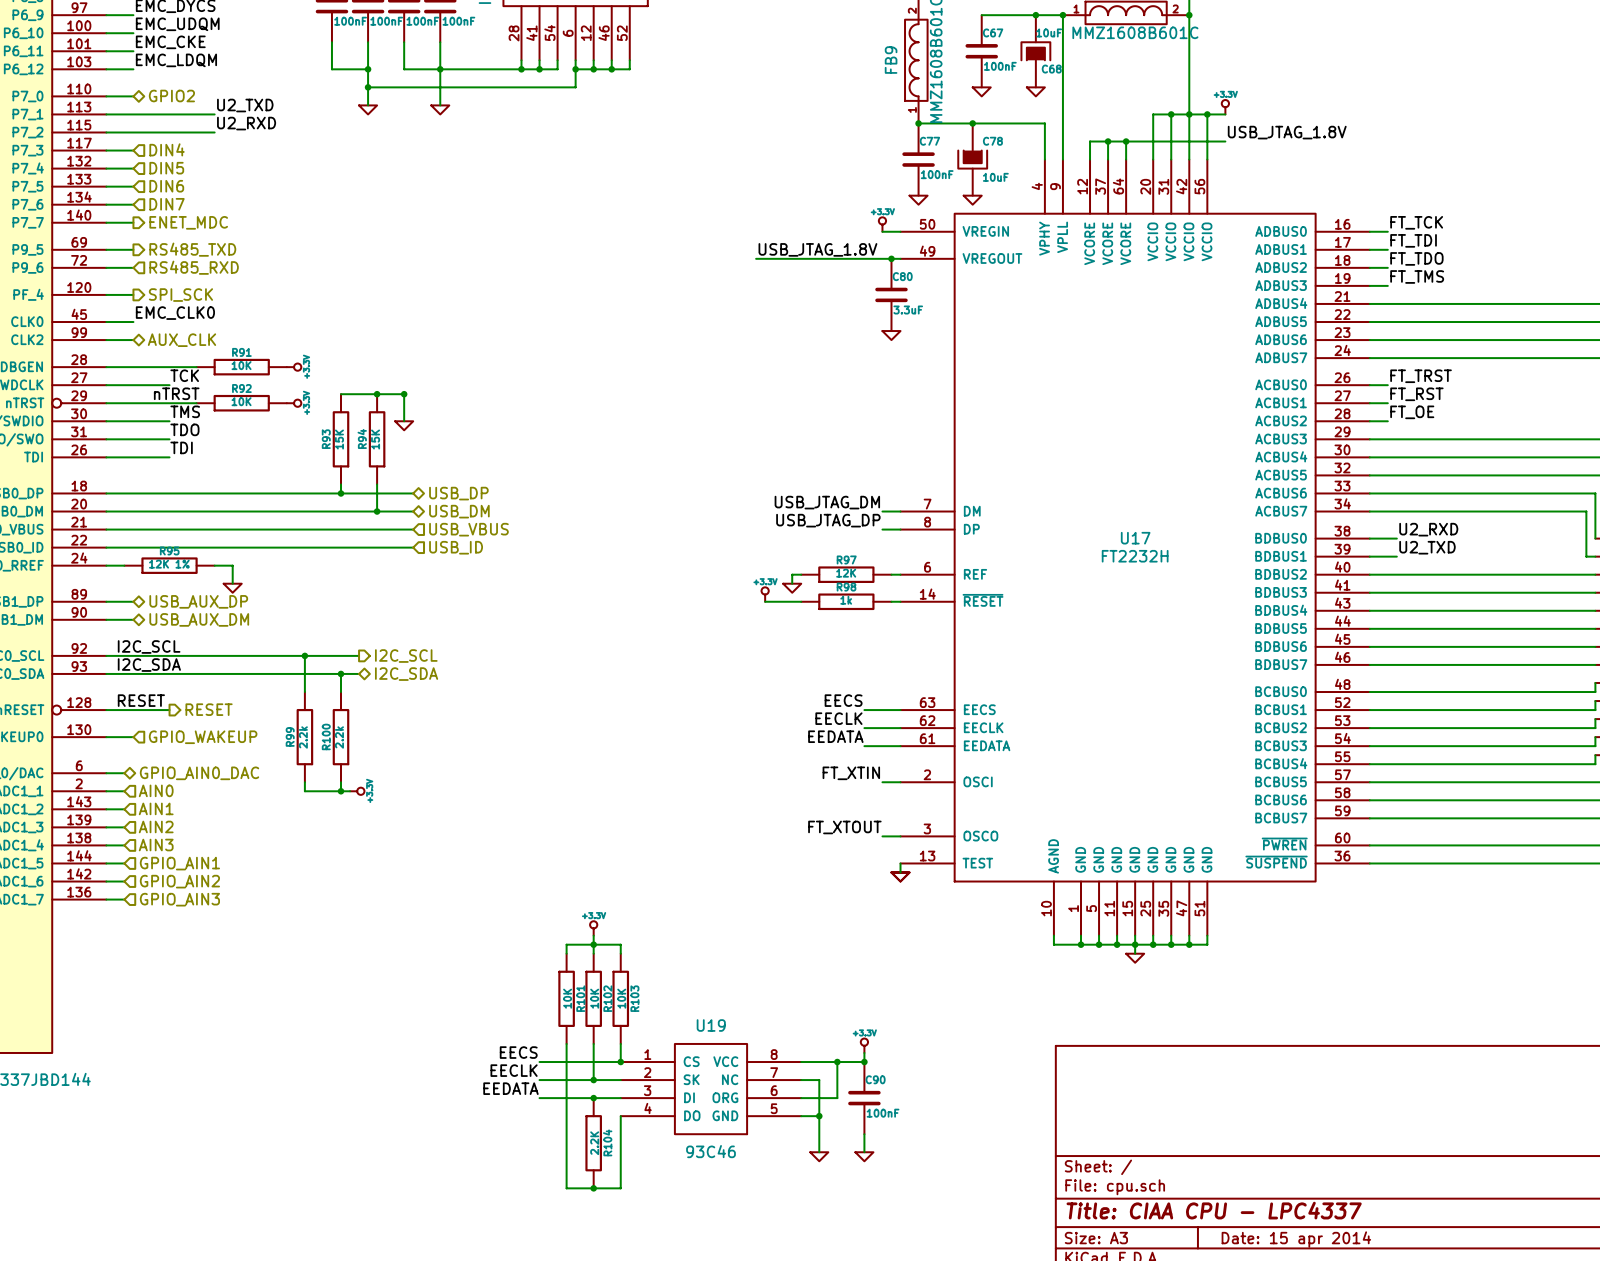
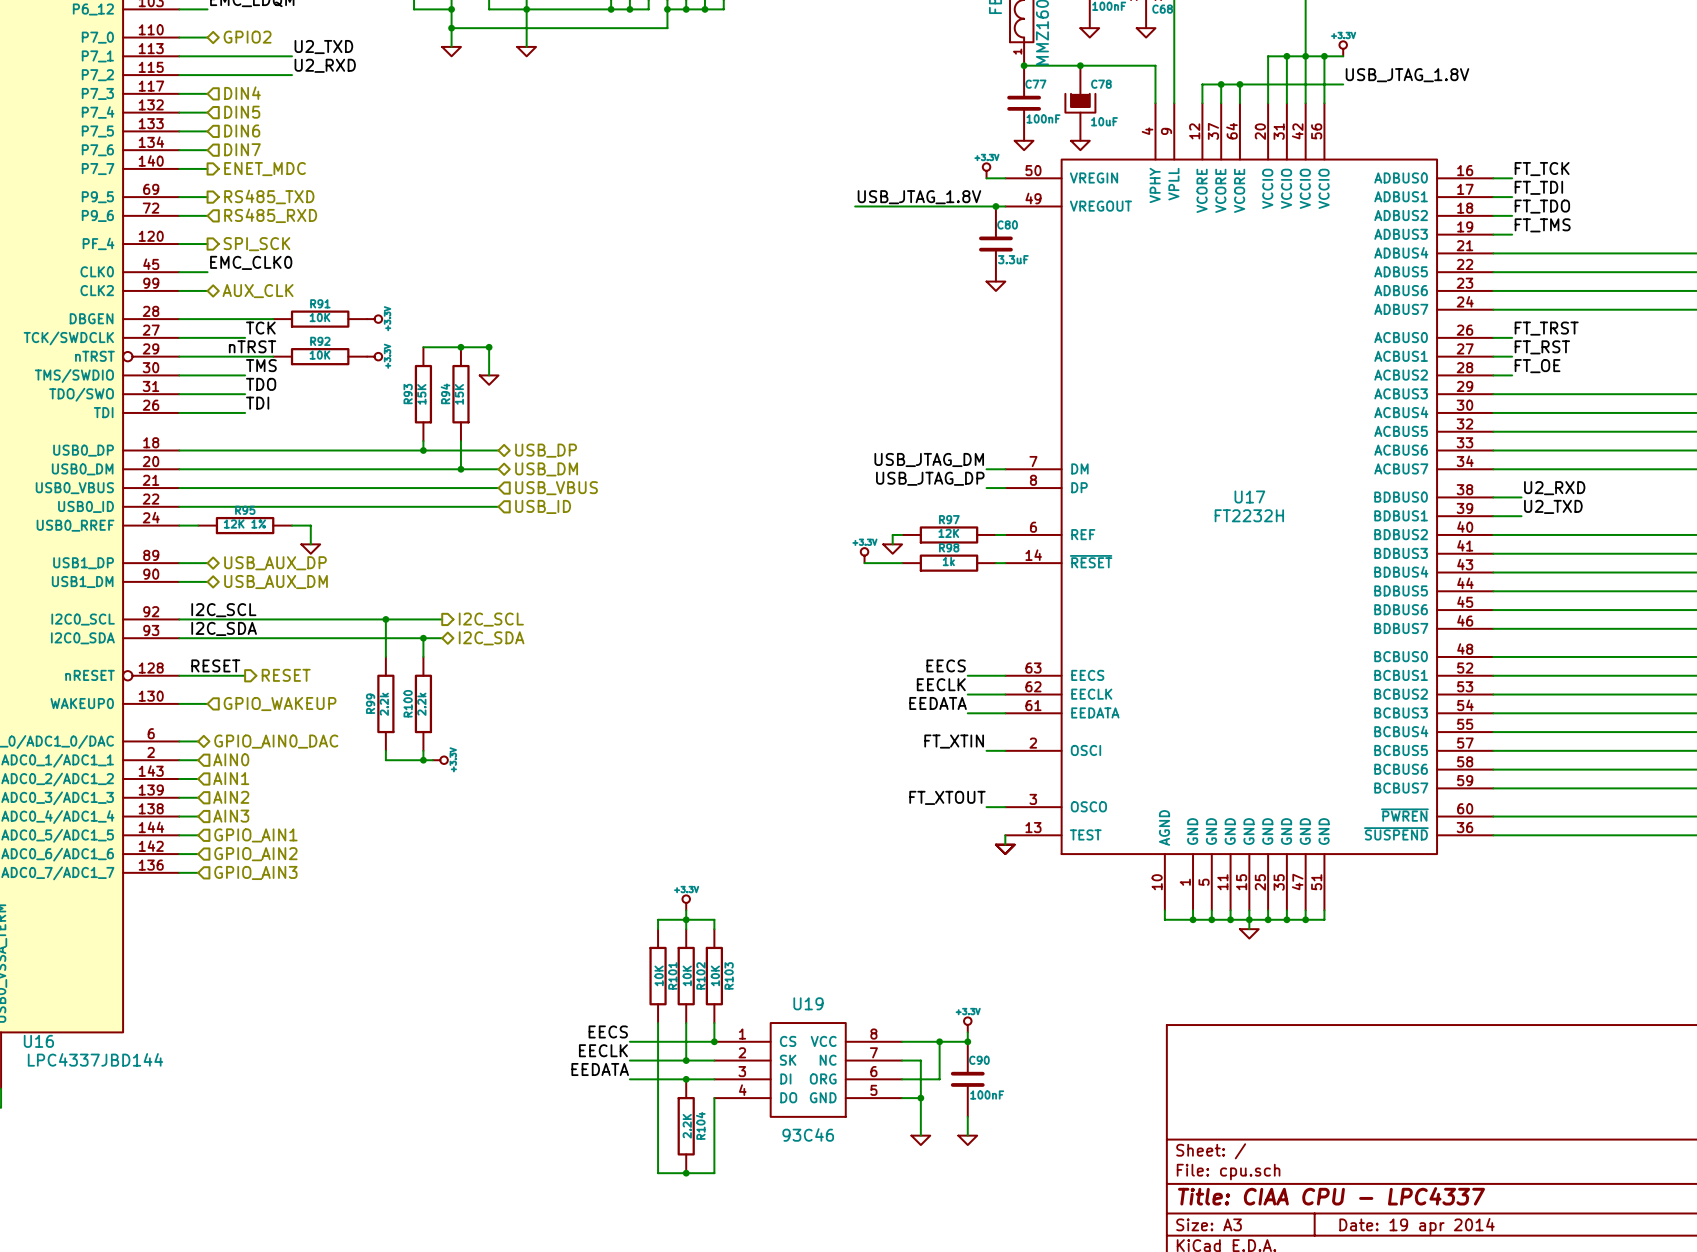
title block: Date: 15 apr 2014 (1296, 1239) -> Date: 19 apr 2014 (1417, 1226)

